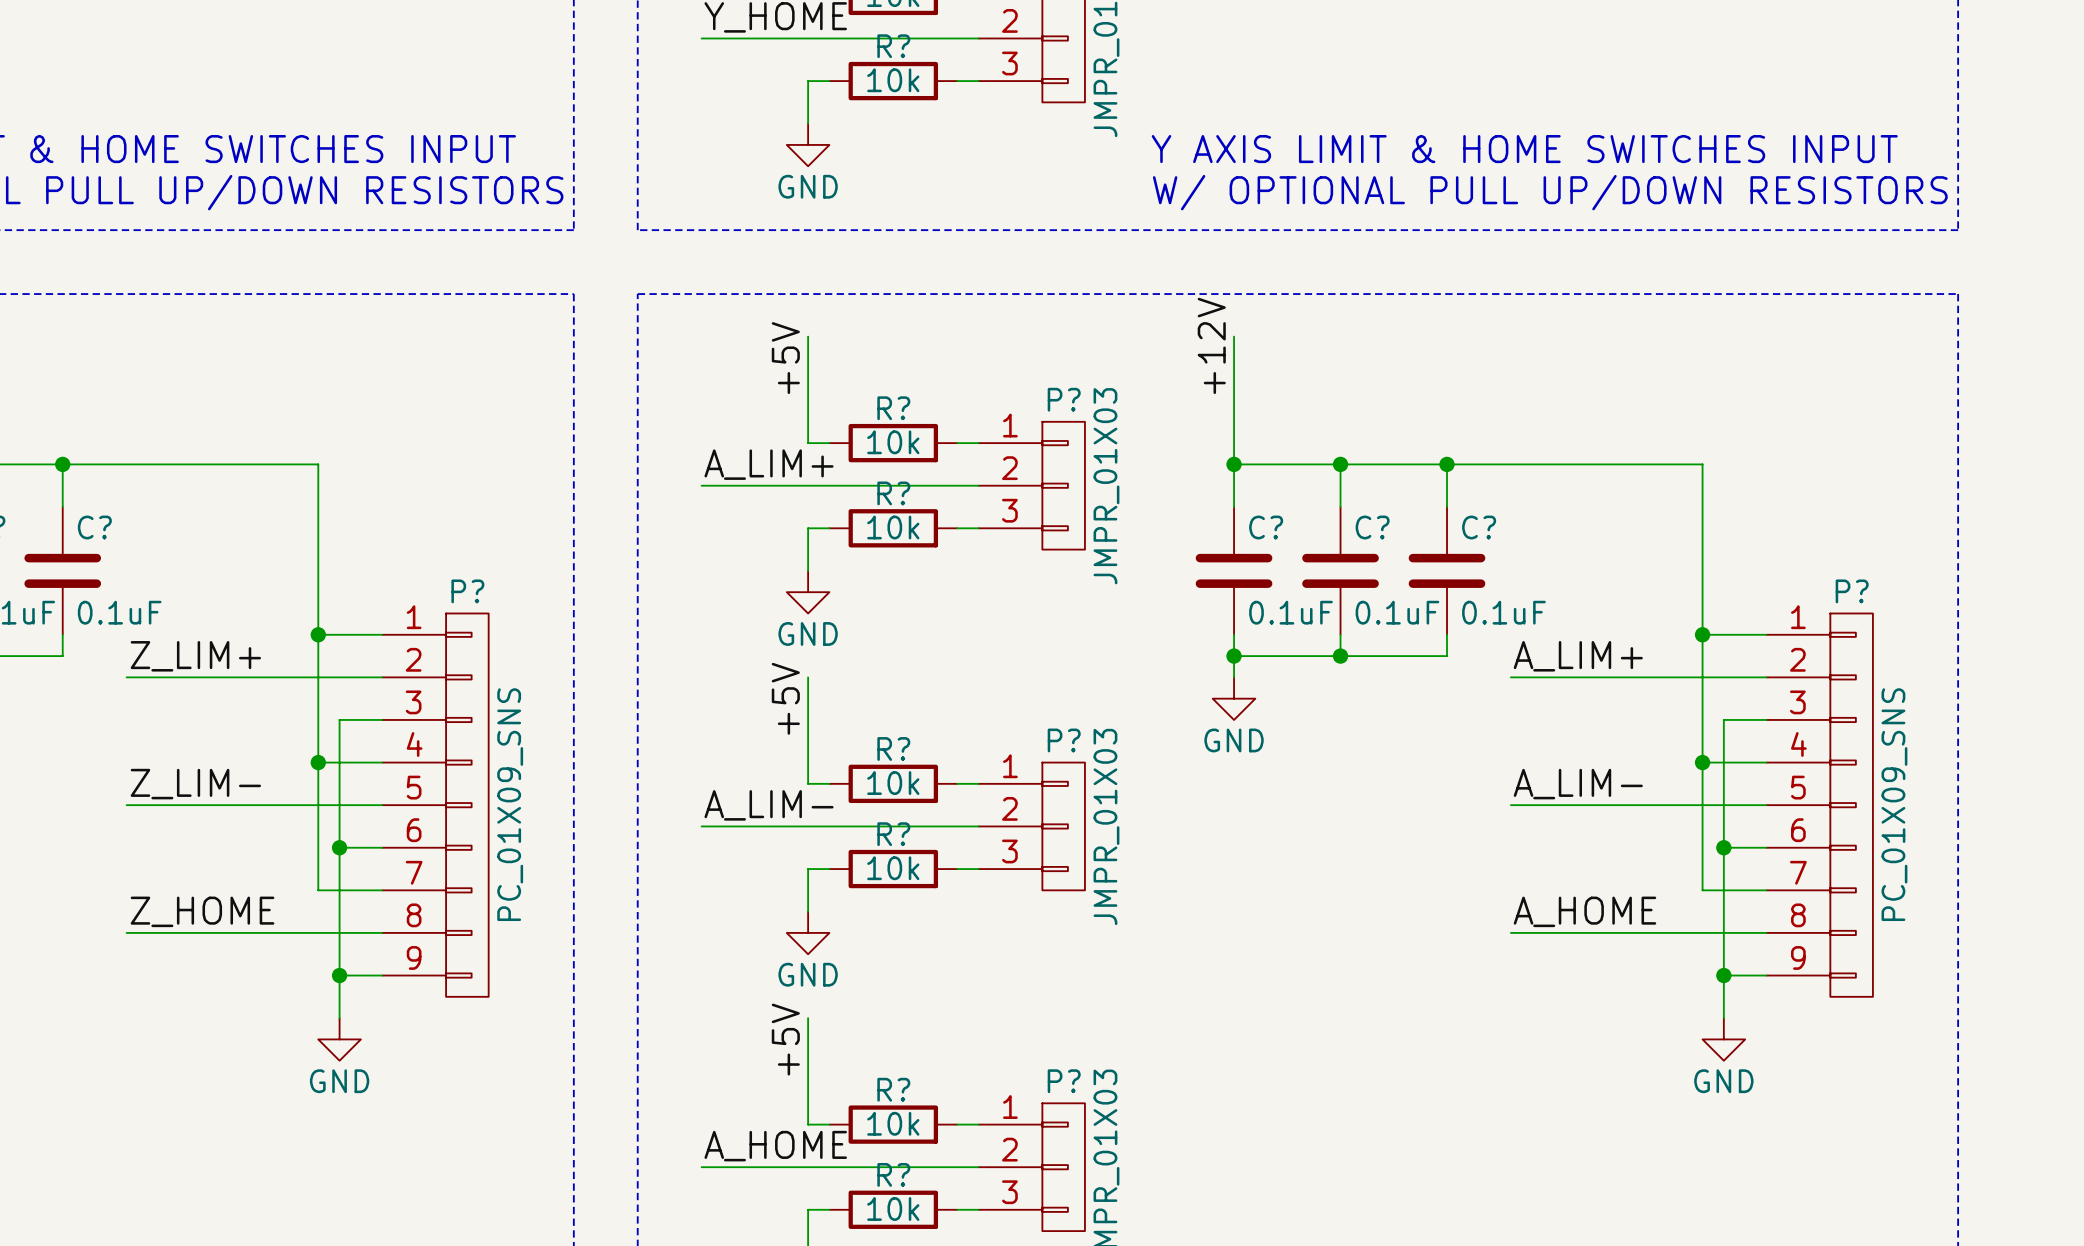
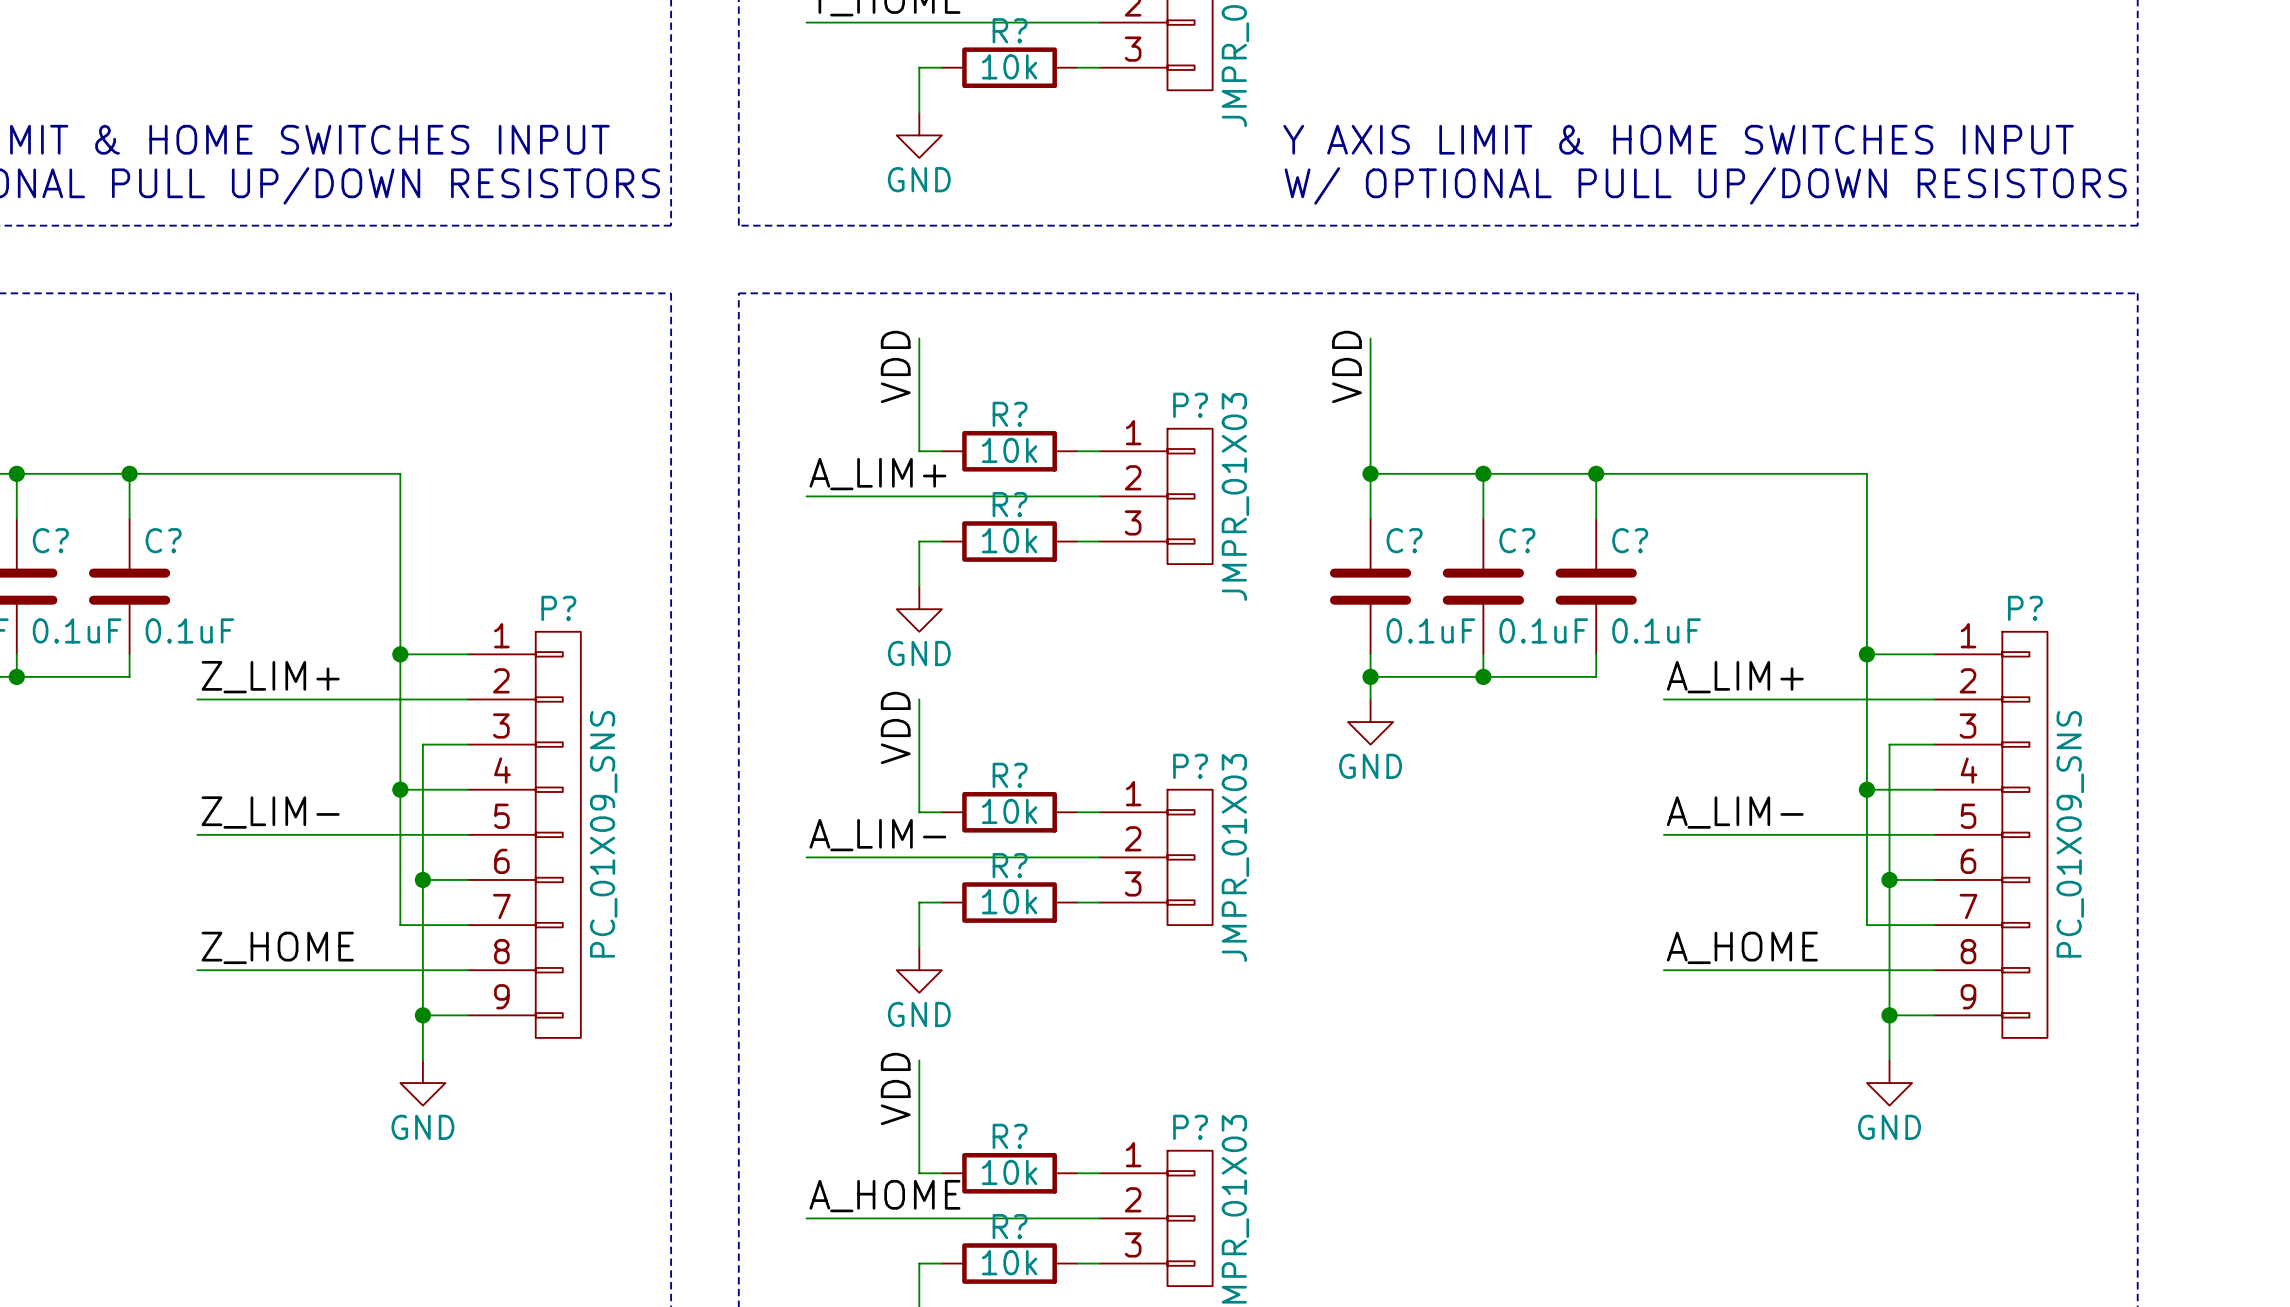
label: +12V (1211, 345) -> VDD (1346, 366)
label: +5V (785, 358) -> VDD (895, 366)
label: +5V (785, 698) -> VDD (895, 727)
label: +5V (785, 1039) -> VDD (895, 1089)

